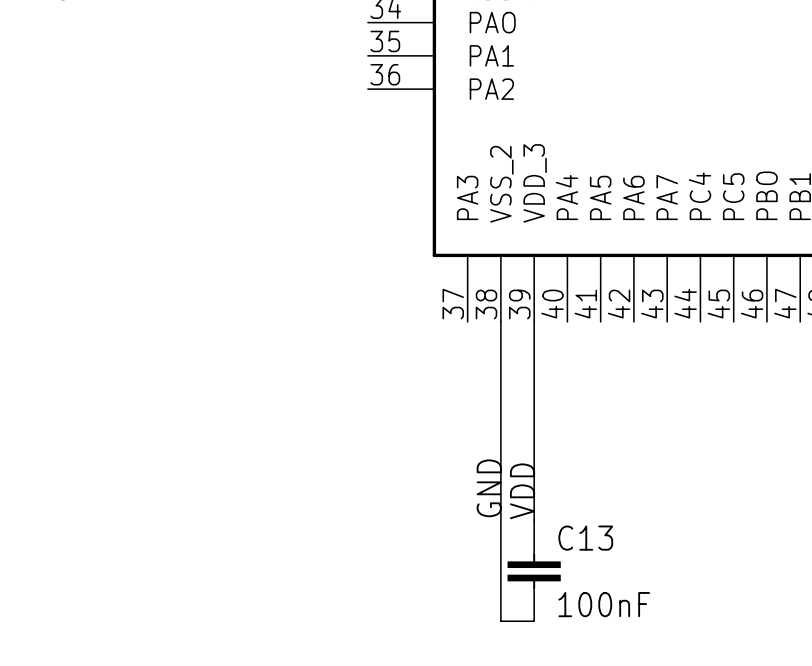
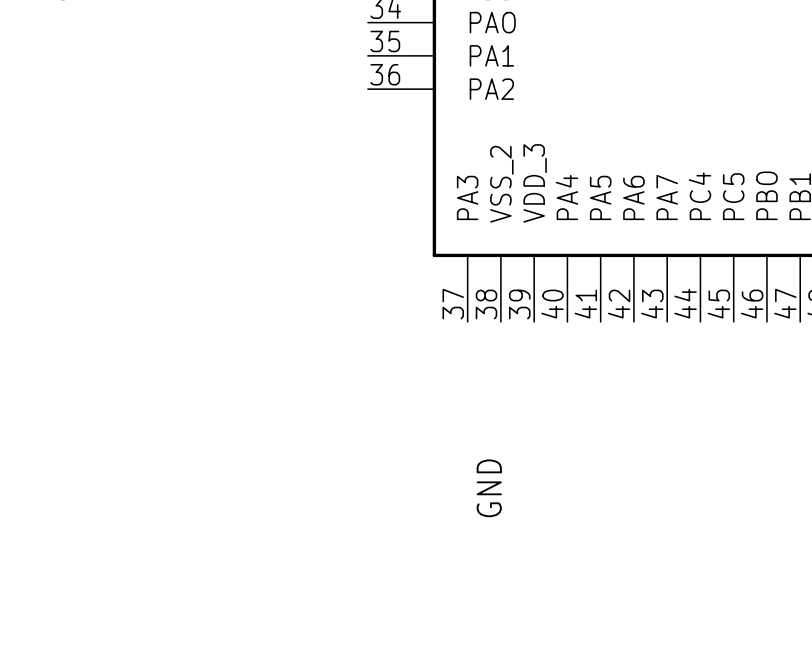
wire: (500, 321) (500, 621) (534, 621) -> none
wire: (534, 321) (534, 521) -> none
label: VDD (522, 491) -> none
C13: 100nF (534, 571) -> none

